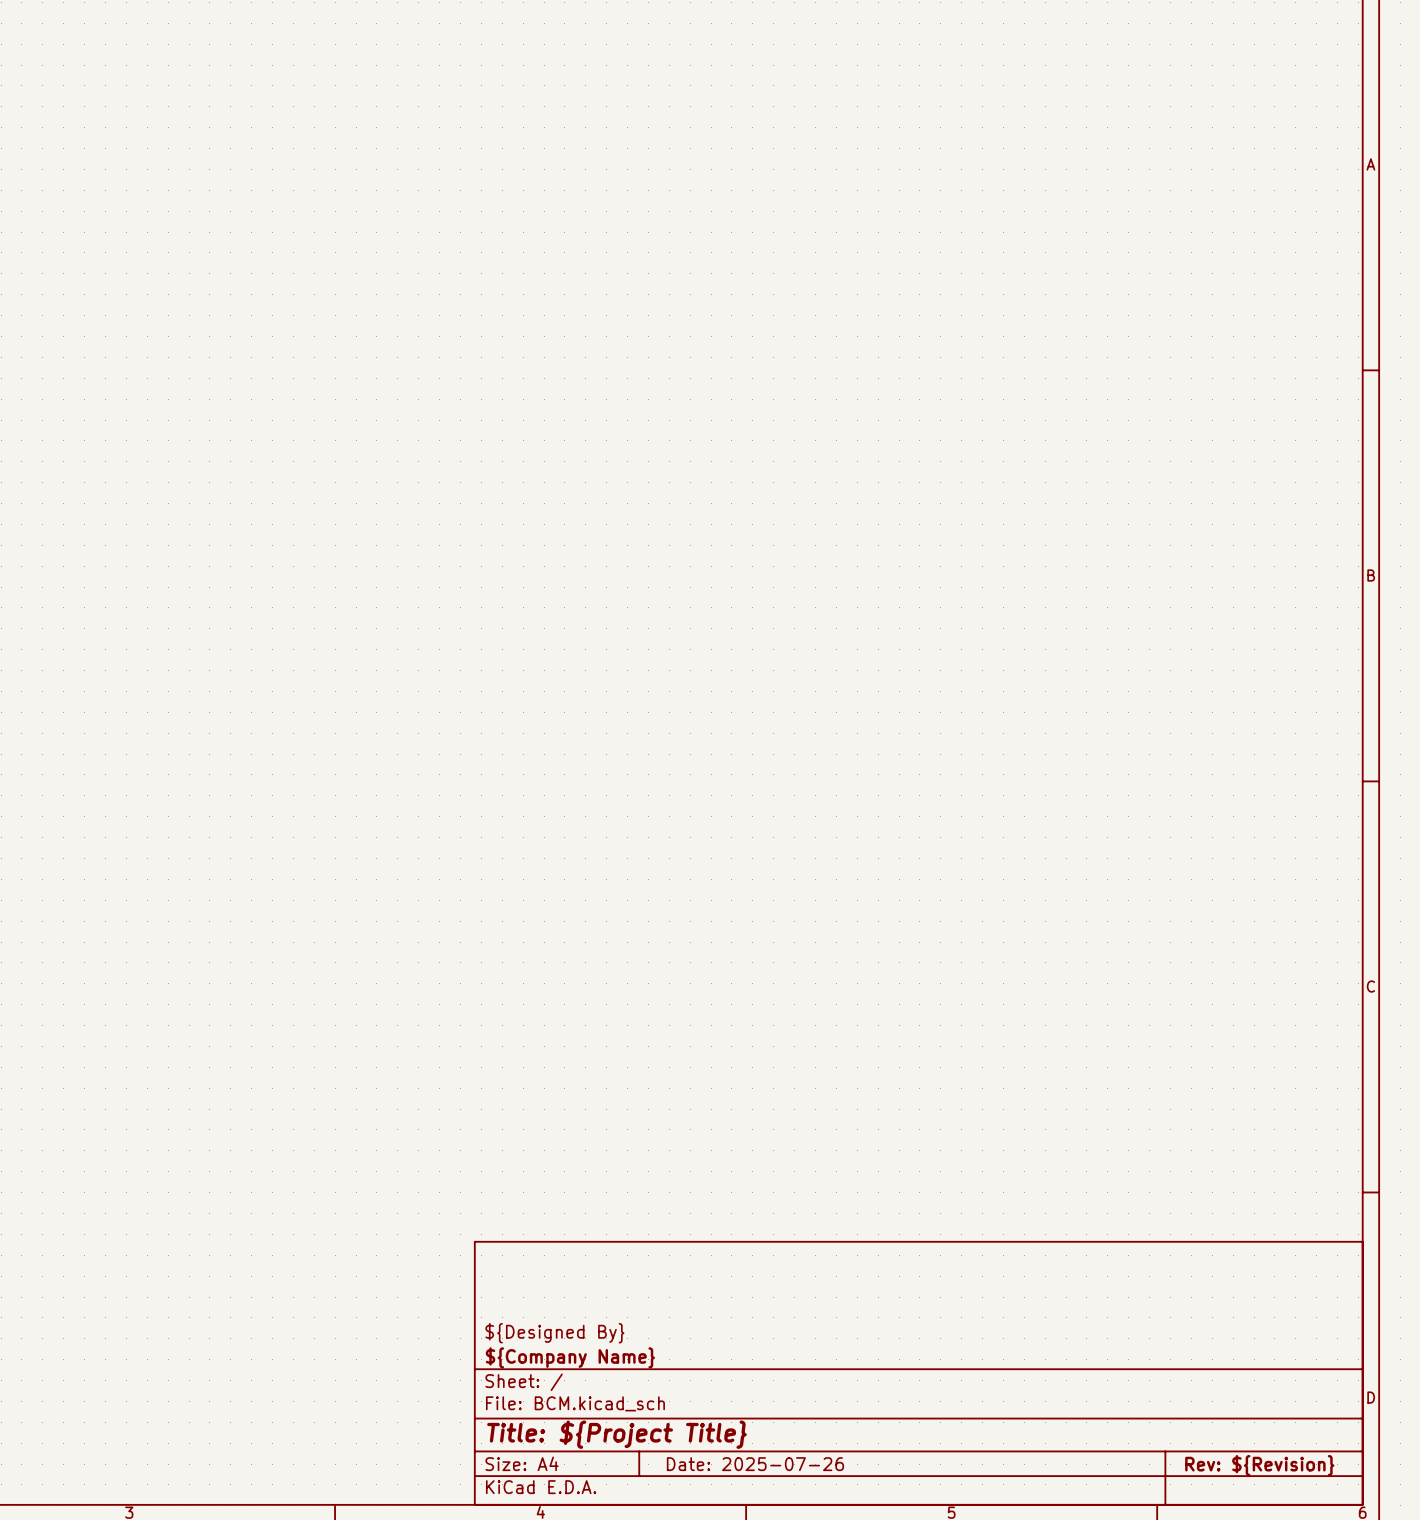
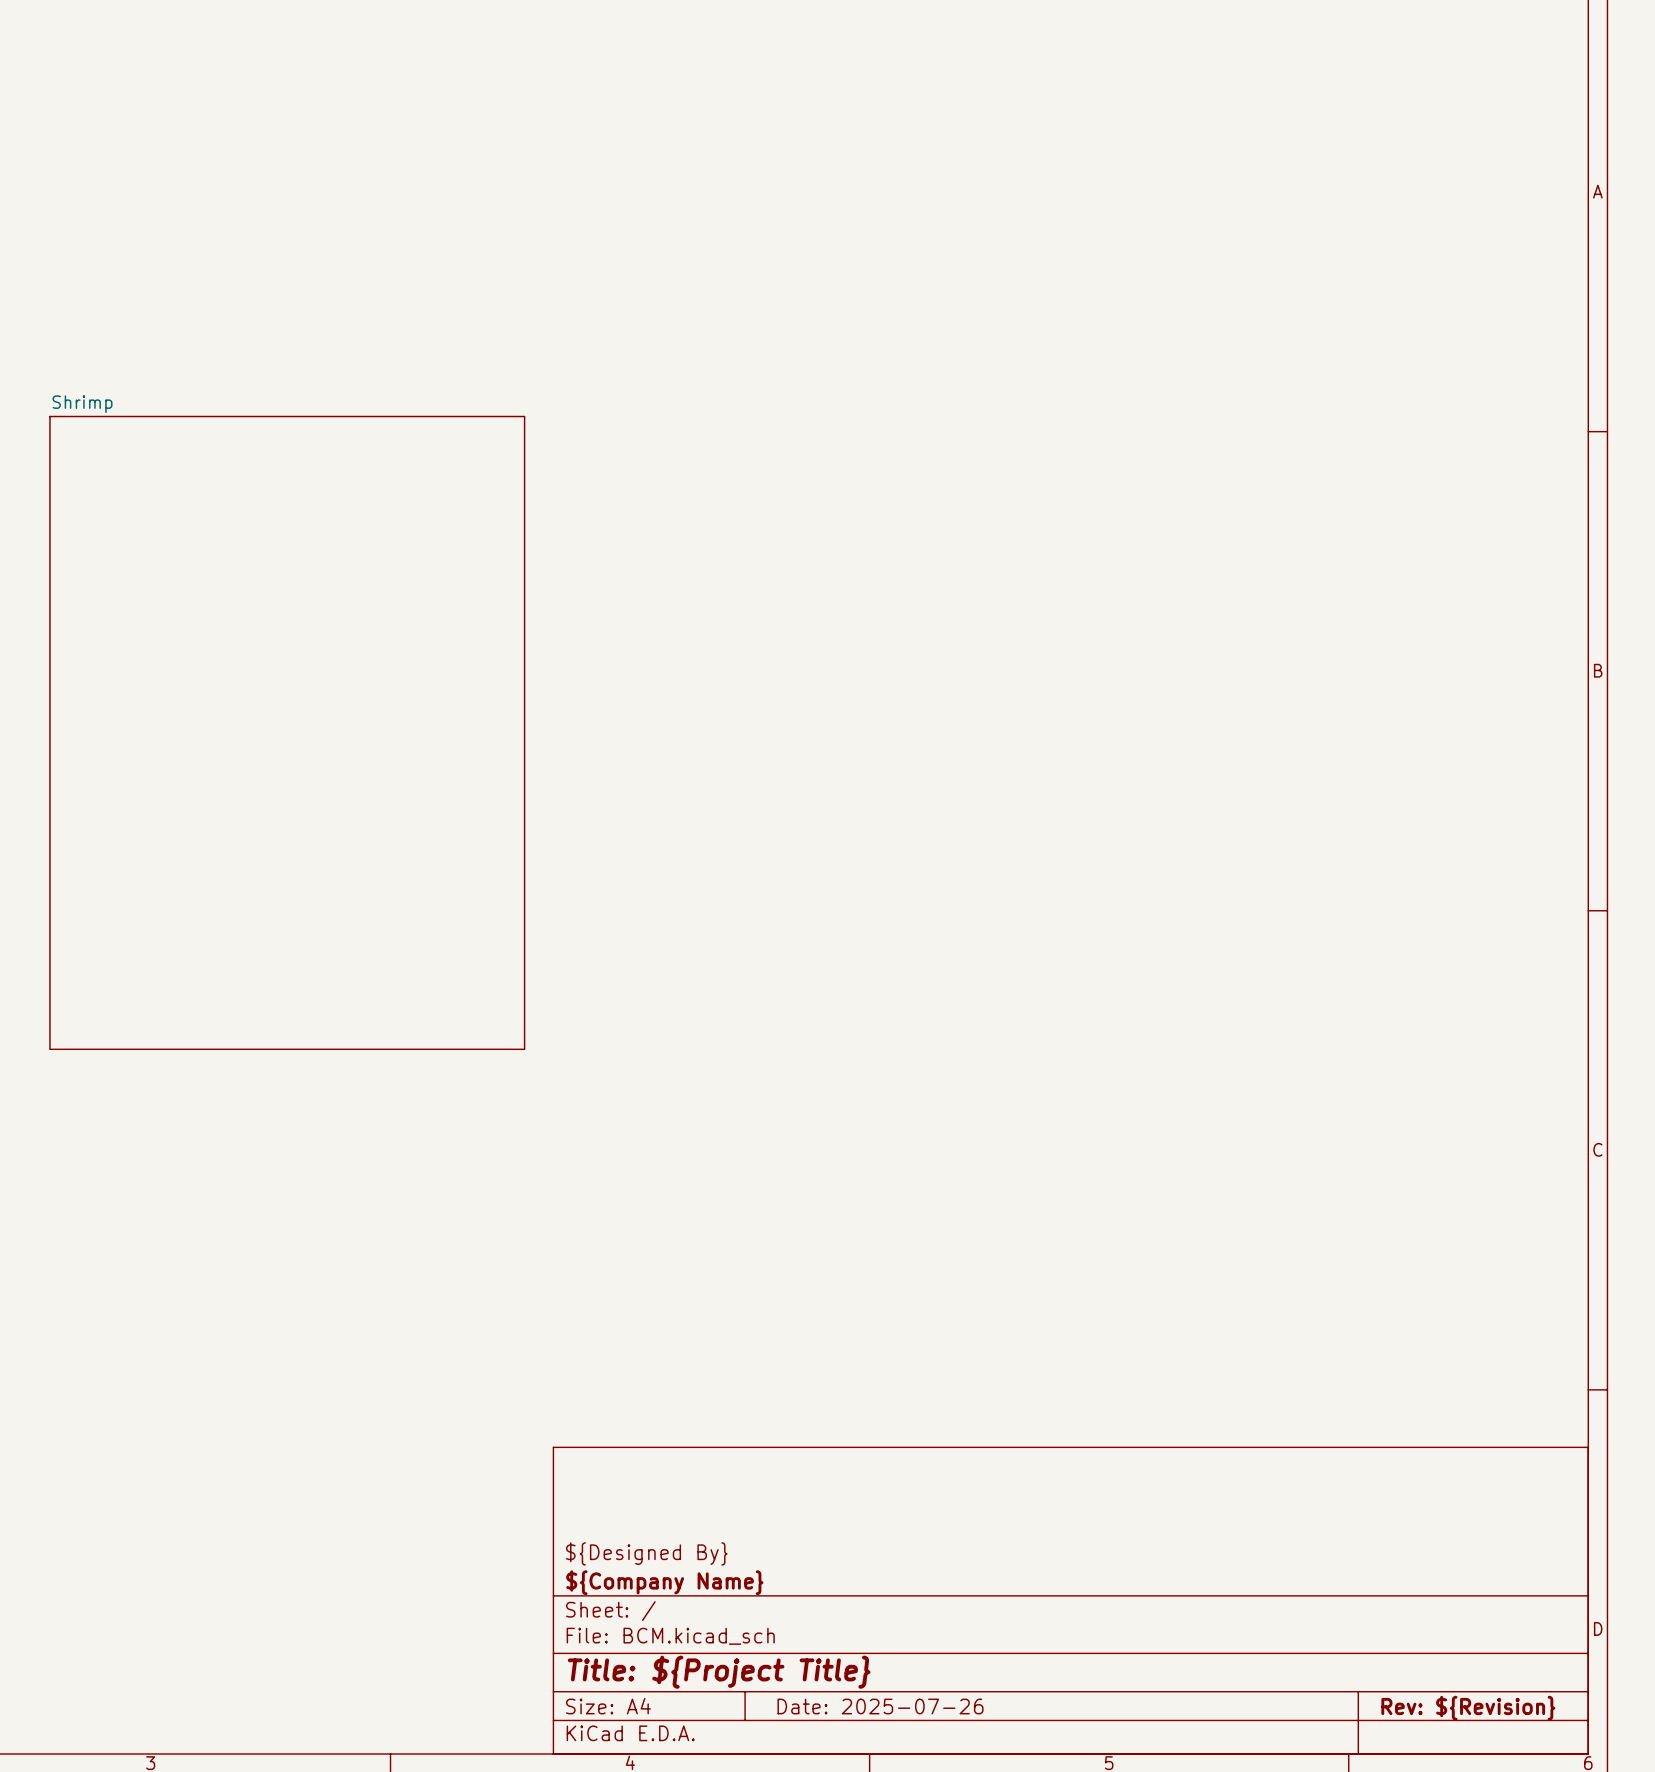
sheet Shrimp: none -> (287, 732)

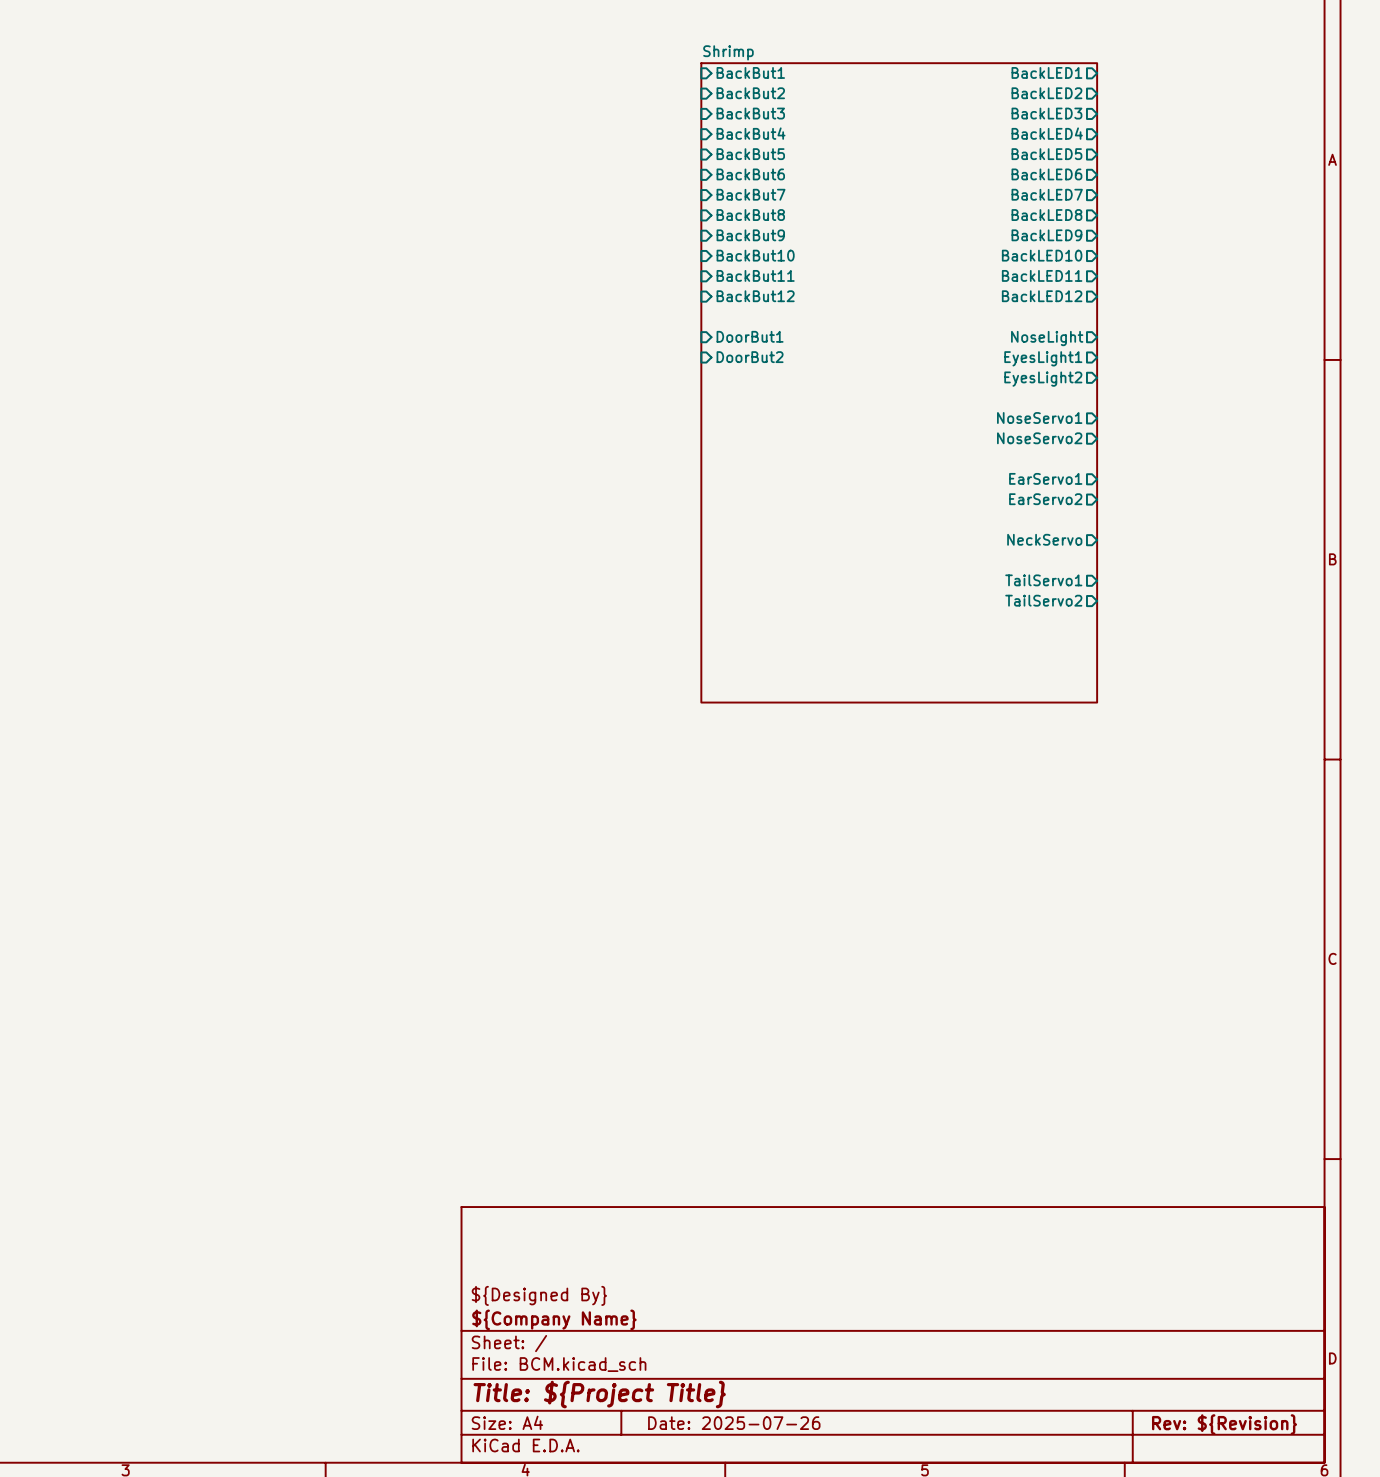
sheet pin: none -> BackBut1 (750, 72)
sheet pin: none -> BackLED1 (1046, 72)
sheet pin: none -> BackBut2 (750, 93)
sheet pin: none -> BackLED2 (1046, 93)
sheet pin: none -> BackBut3 (750, 113)
sheet pin: none -> BackLED3 (1046, 113)
sheet pin: none -> BackBut4 (751, 133)
sheet pin: none -> BackLED4 (1047, 133)
sheet pin: none -> BackBut5 (750, 154)
sheet pin: none -> BackLED5 (1046, 154)
sheet pin: none -> BackBut6 (750, 174)
sheet pin: none -> BackLED6 (1046, 174)
sheet pin: none -> BackBut7 (751, 194)
sheet pin: none -> BackLED7 (1047, 194)
sheet pin: none -> BackBut8 (750, 215)
sheet pin: none -> BackLED8 (1046, 215)
sheet pin: none -> BackBut9 (750, 235)
sheet pin: none -> BackLED9 (1046, 235)
sheet pin: none -> BackBut10 (755, 255)
sheet pin: none -> BackLED10 (1042, 255)
sheet pin: none -> BackBut11 (755, 275)
sheet pin: none -> BackLED11 (1042, 275)
sheet pin: none -> BackBut12 (755, 296)
sheet pin: none -> BackLED12 (1042, 296)
sheet pin: none -> DoorBut1 (750, 336)
sheet pin: none -> NoseLight (1047, 338)
sheet pin: none -> DoorBut2 (750, 357)
sheet pin: none -> EyesLight1 (1043, 358)
sheet pin: none -> EyesLight2 (1043, 379)
sheet Shrimp: none -> (899, 382)
sheet pin: none -> NoseServo1 (1039, 418)
sheet pin: none -> NoseServo2 (1039, 438)
sheet pin: none -> EarServo1 (1045, 478)
sheet pin: none -> EarServo2 (1045, 499)
sheet pin: none -> NeckServo (1044, 539)
sheet pin: none -> TailServo1 (1043, 580)
sheet pin: none -> TailServo2 (1043, 600)
sheet Shrimp: (287, 732) -> none

